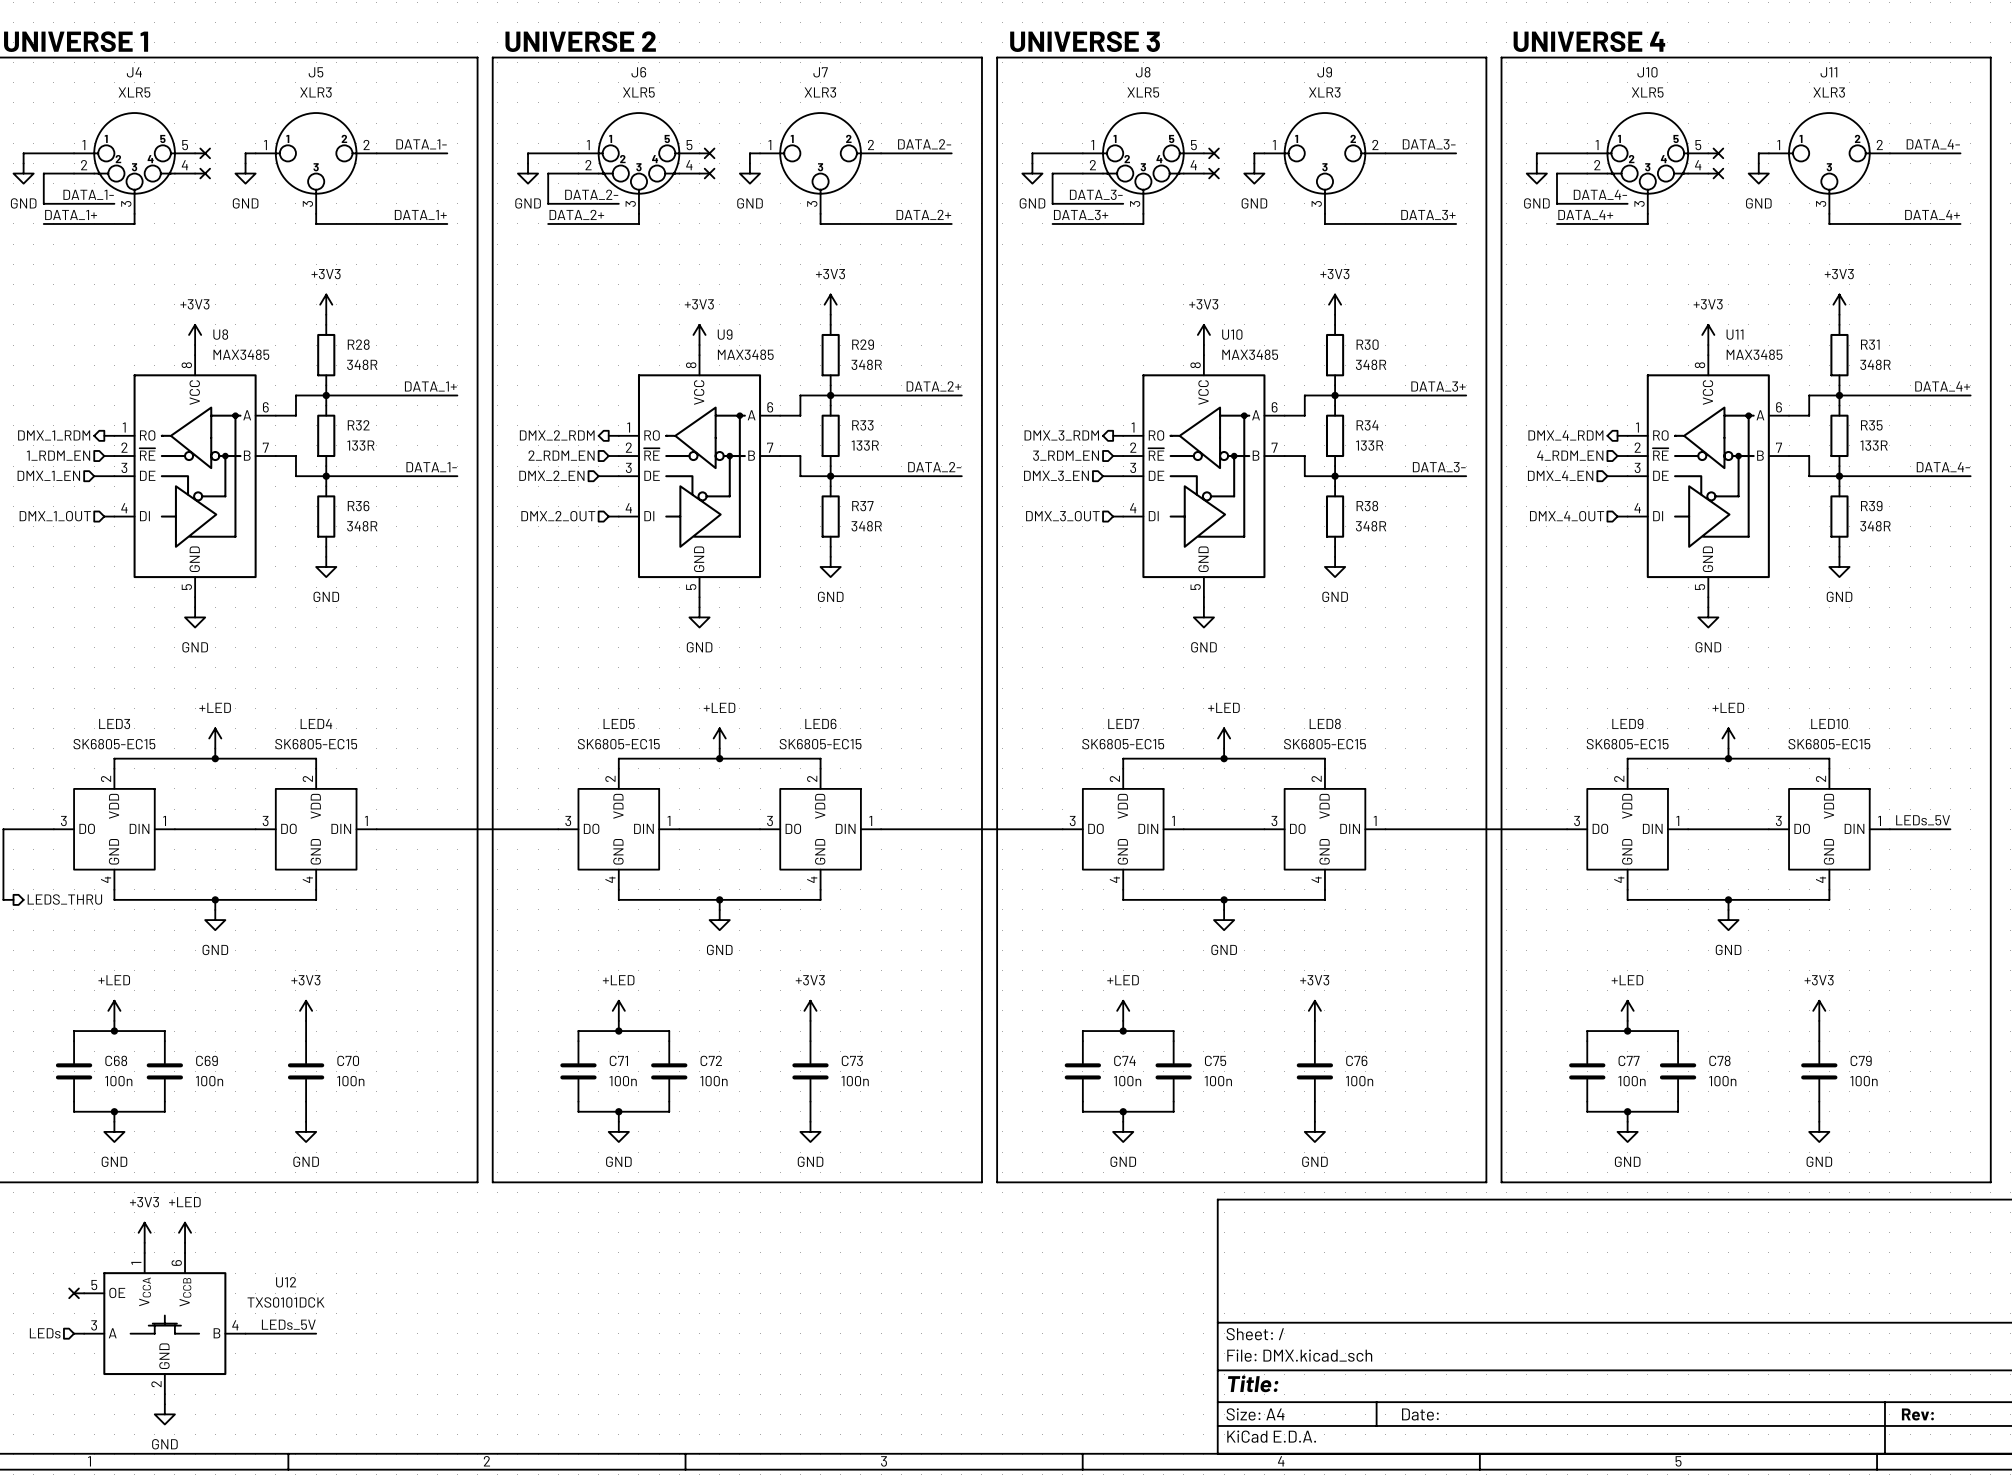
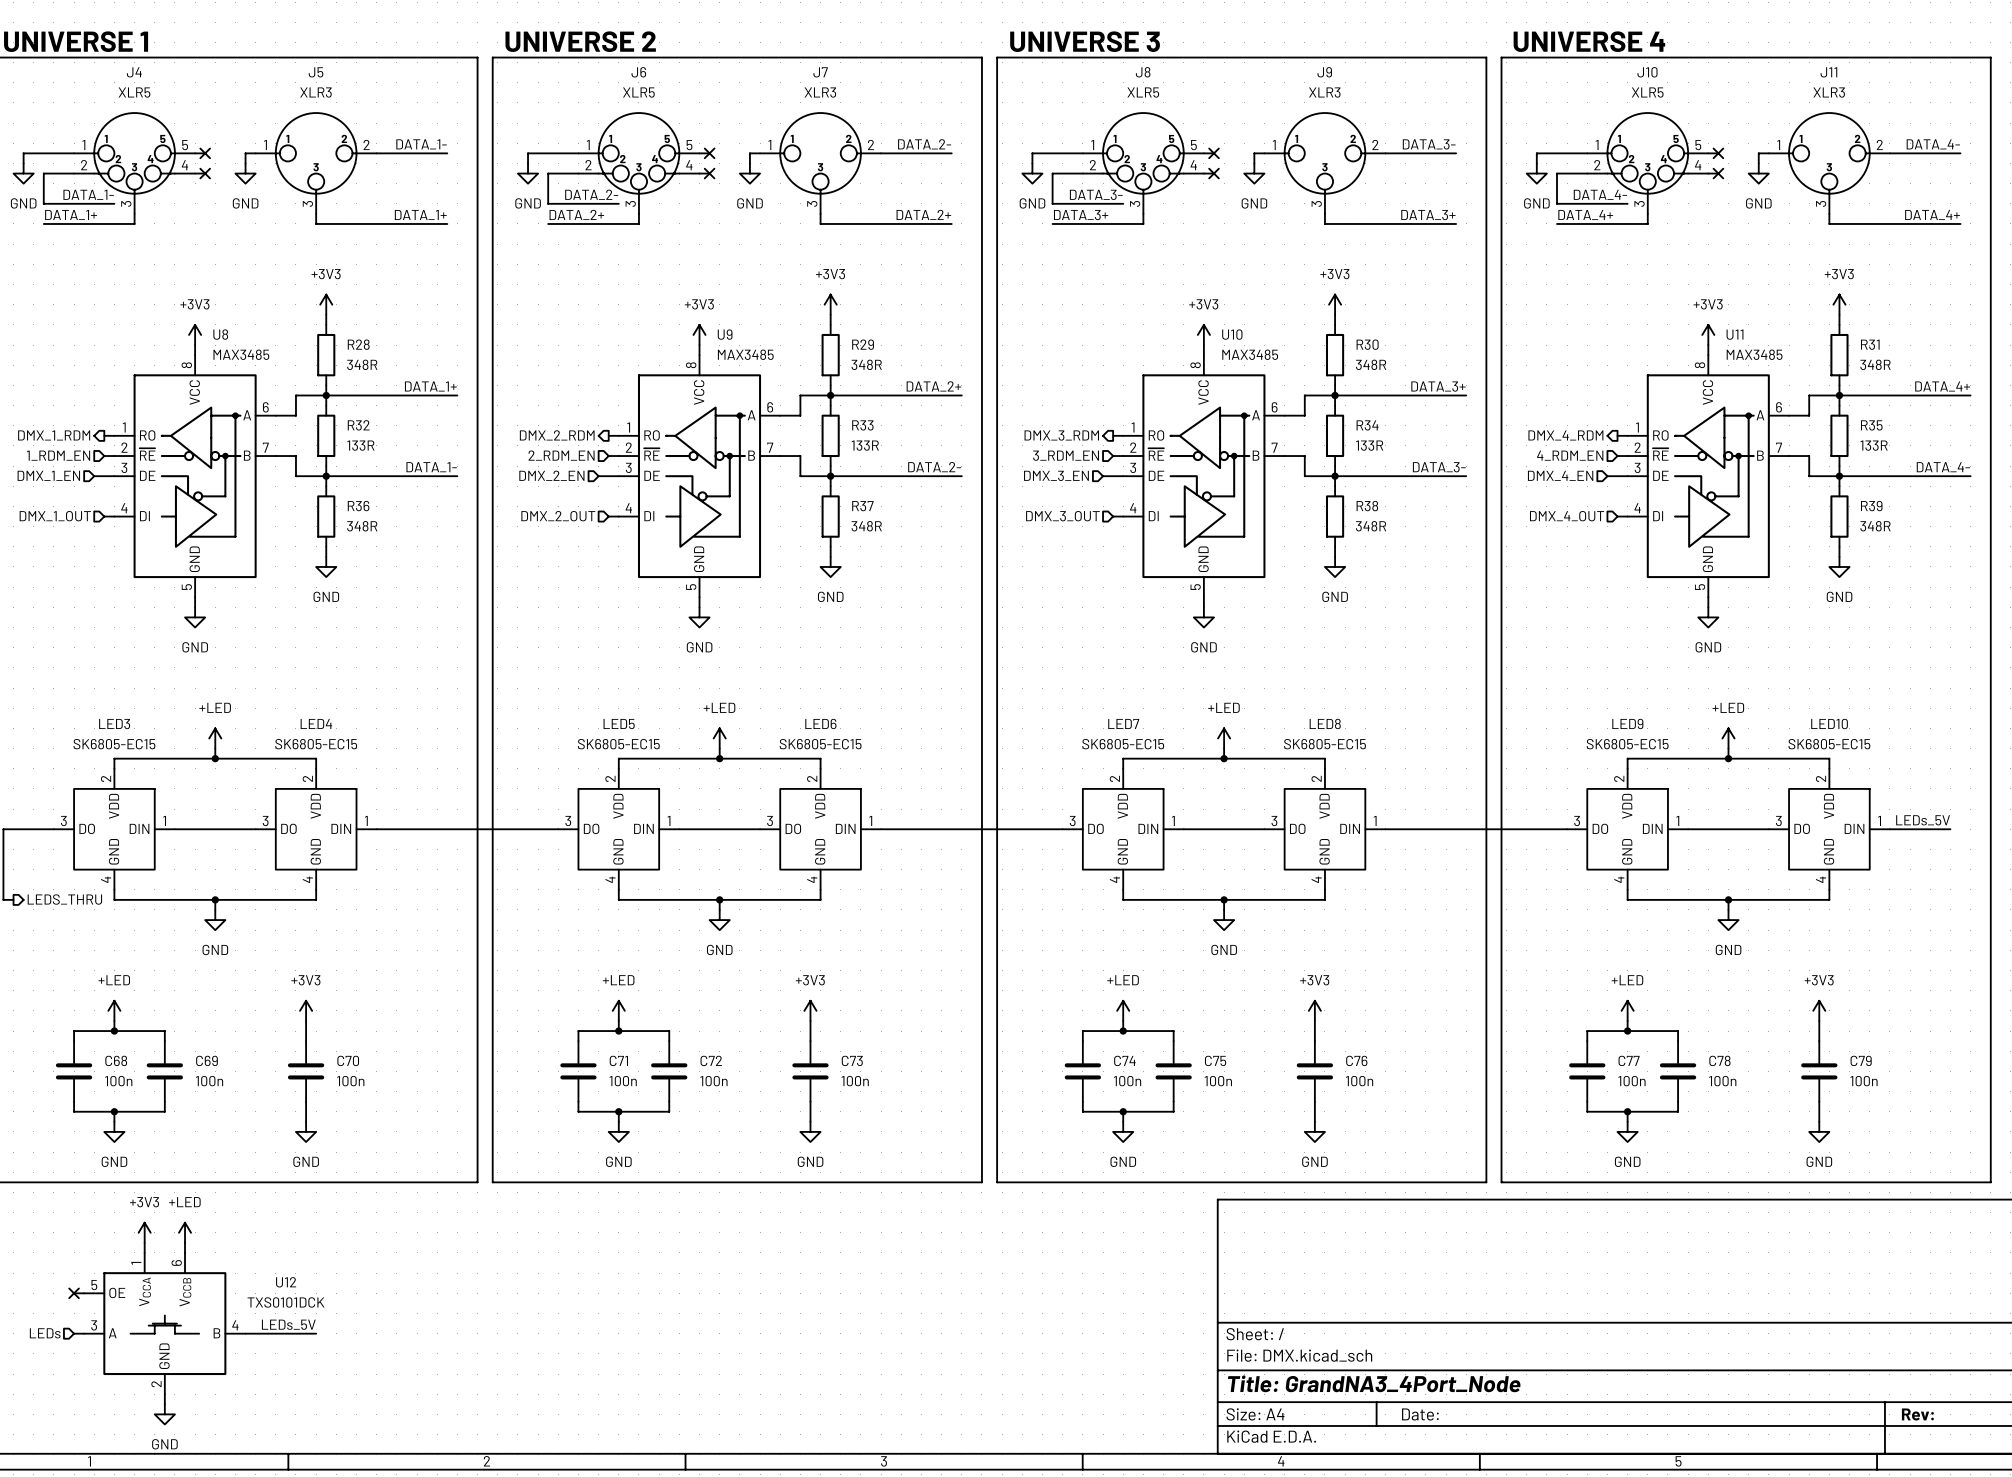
title block: Title: (1253, 1383) -> Title: GrandNA3_4Port_Node (1374, 1383)

